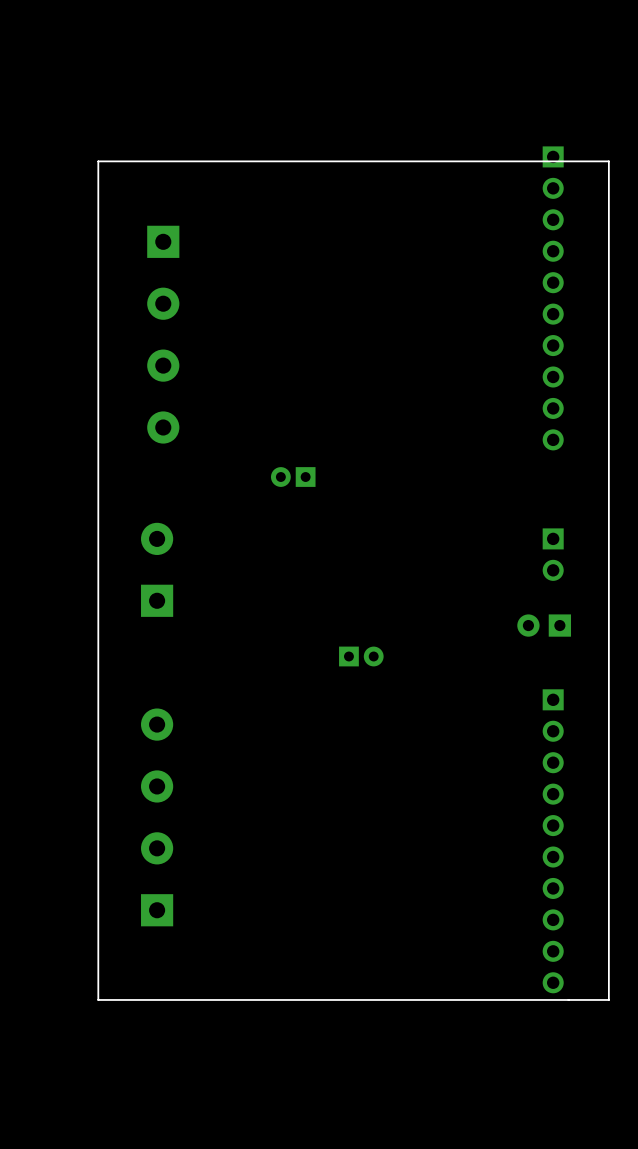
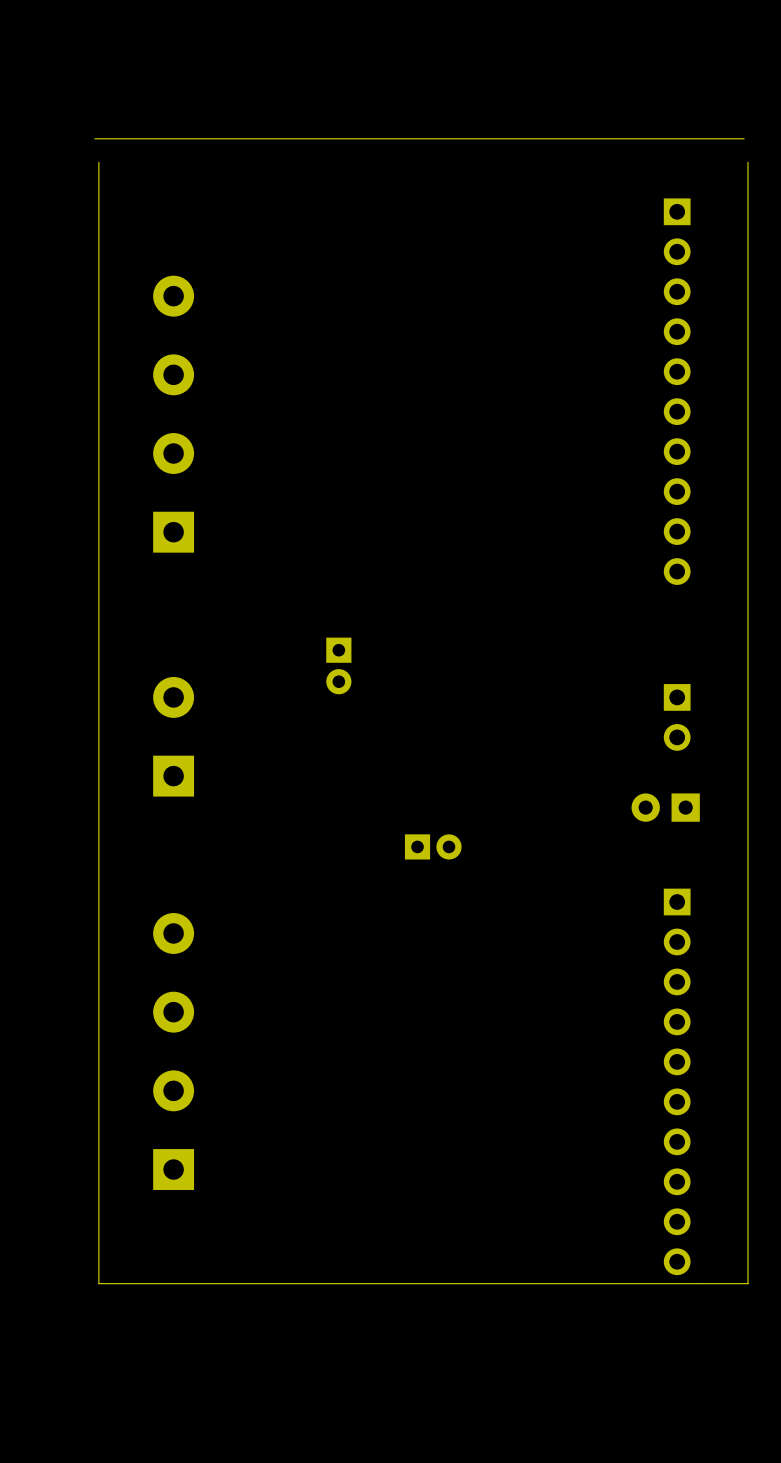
board edge: none -> (744, 138) (94, 138)
board edge: none -> (98, 162) (98, 217)
board edge: (608, 161) (98, 161) -> (747, 217) (747, 162)
part rotation: 0° (163, 334) -> 180° (173, 414)
part rotation: 0° (293, 477) -> 90° counterclockwise (338, 665)
part position: (293, 477) -> (338, 665)

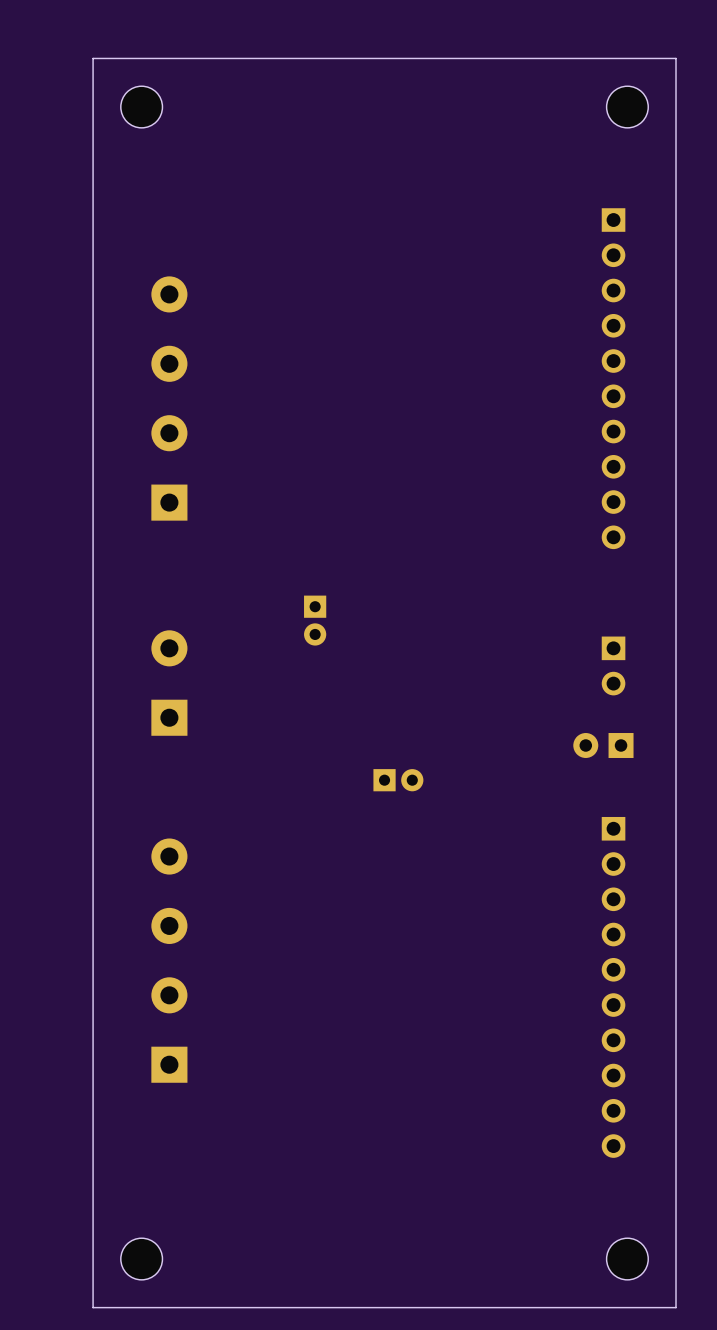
part: none -> (141, 107)
part: none -> (627, 107)
board edge: (744, 138) (94, 138) -> none
board edge: (98, 162) (98, 1283) (747, 1283) -> (676, 176) (676, 58) (93, 58) (93, 1307) (676, 1307) (676, 1165)
part: none -> (141, 1259)
part: none -> (627, 1259)

